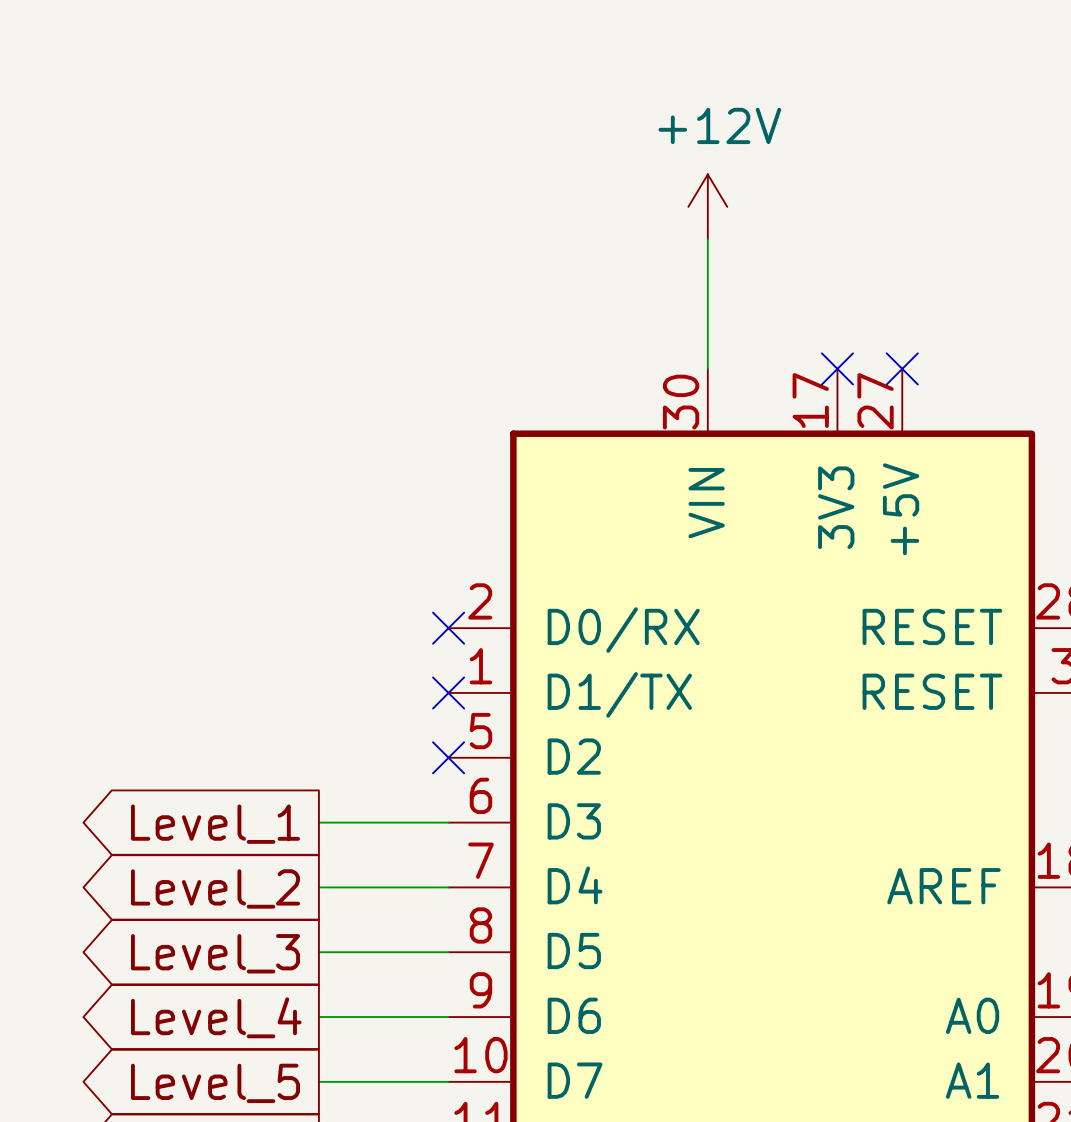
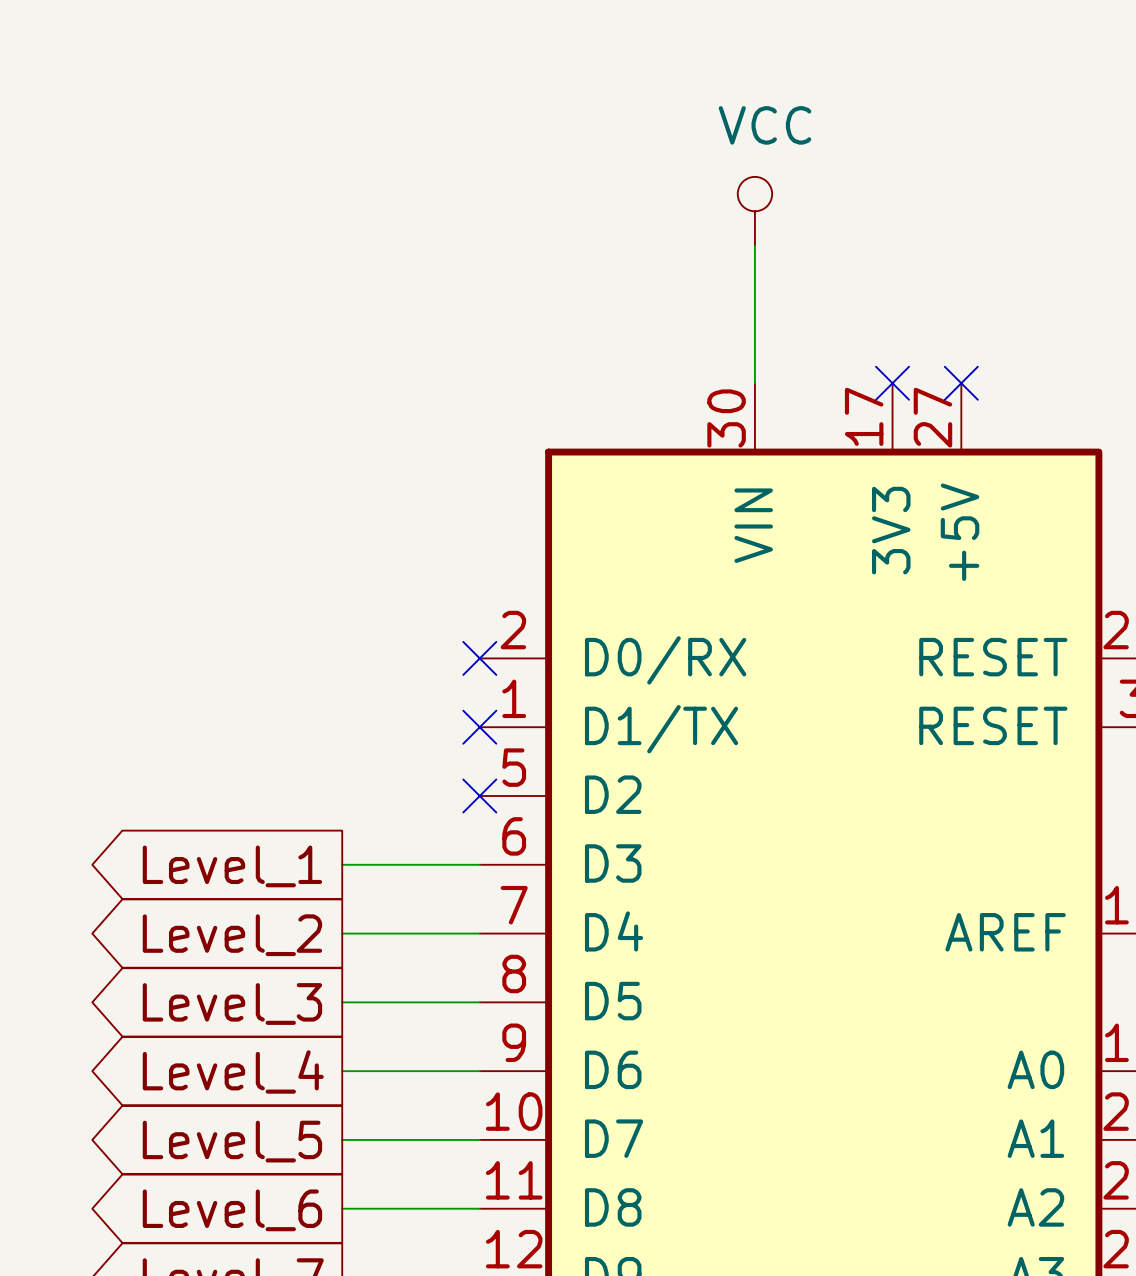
power symbol: +12V (707, 206) -> VCC (754, 211)

